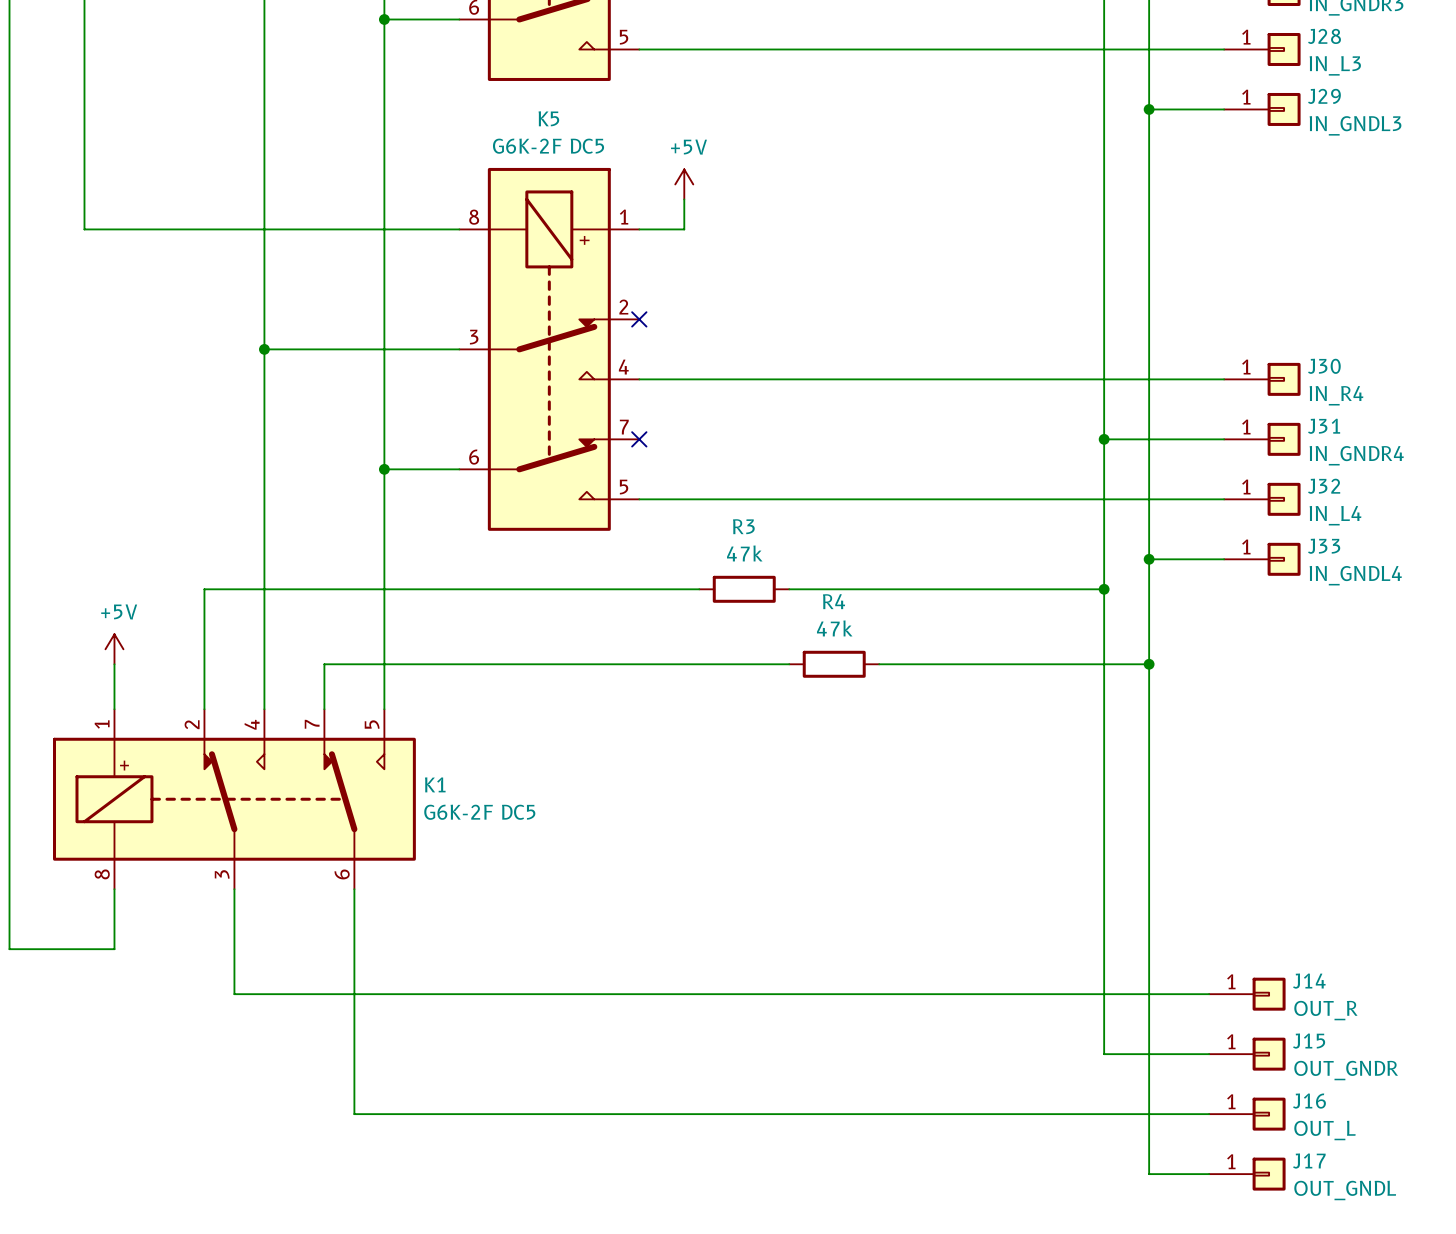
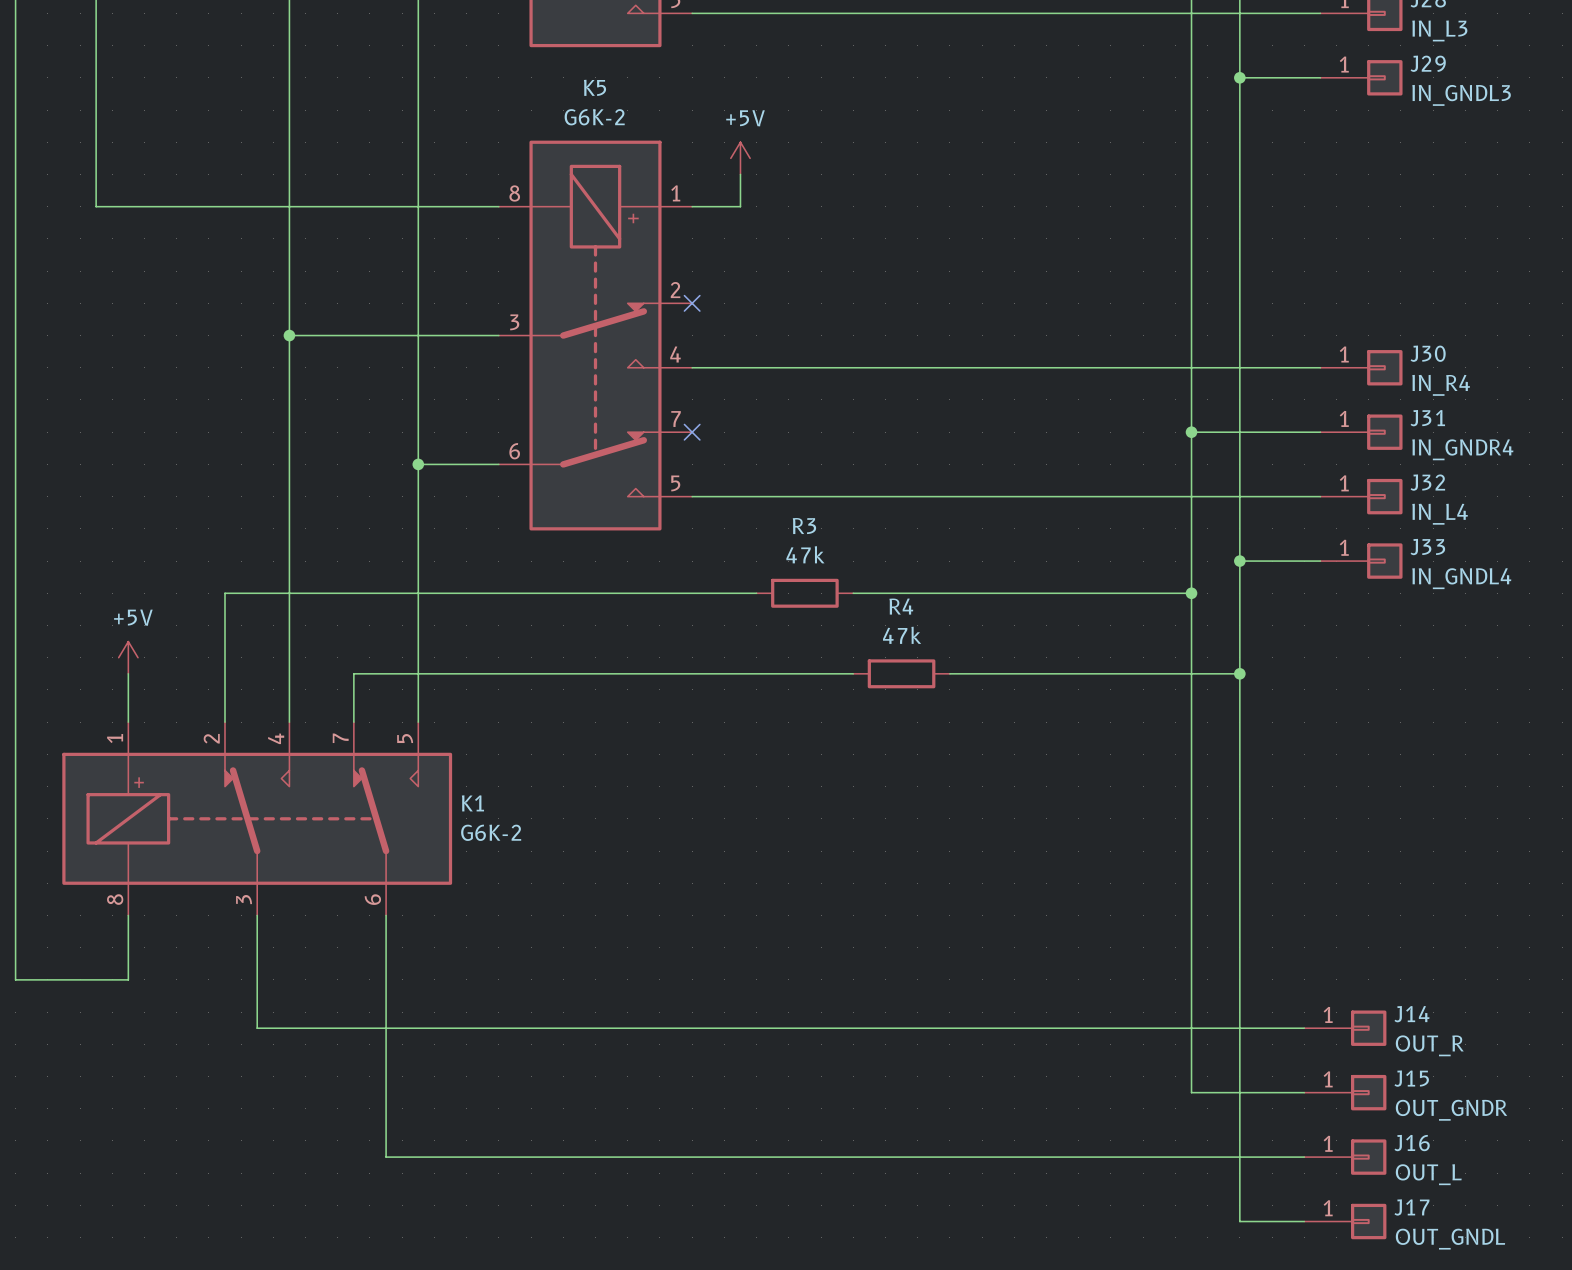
K5 value: G6K-2F DC5 (548, 146) -> G6K-2 (594, 117)
K1 value: G6K-2F DC5 (479, 812) -> G6K-2 (491, 832)

